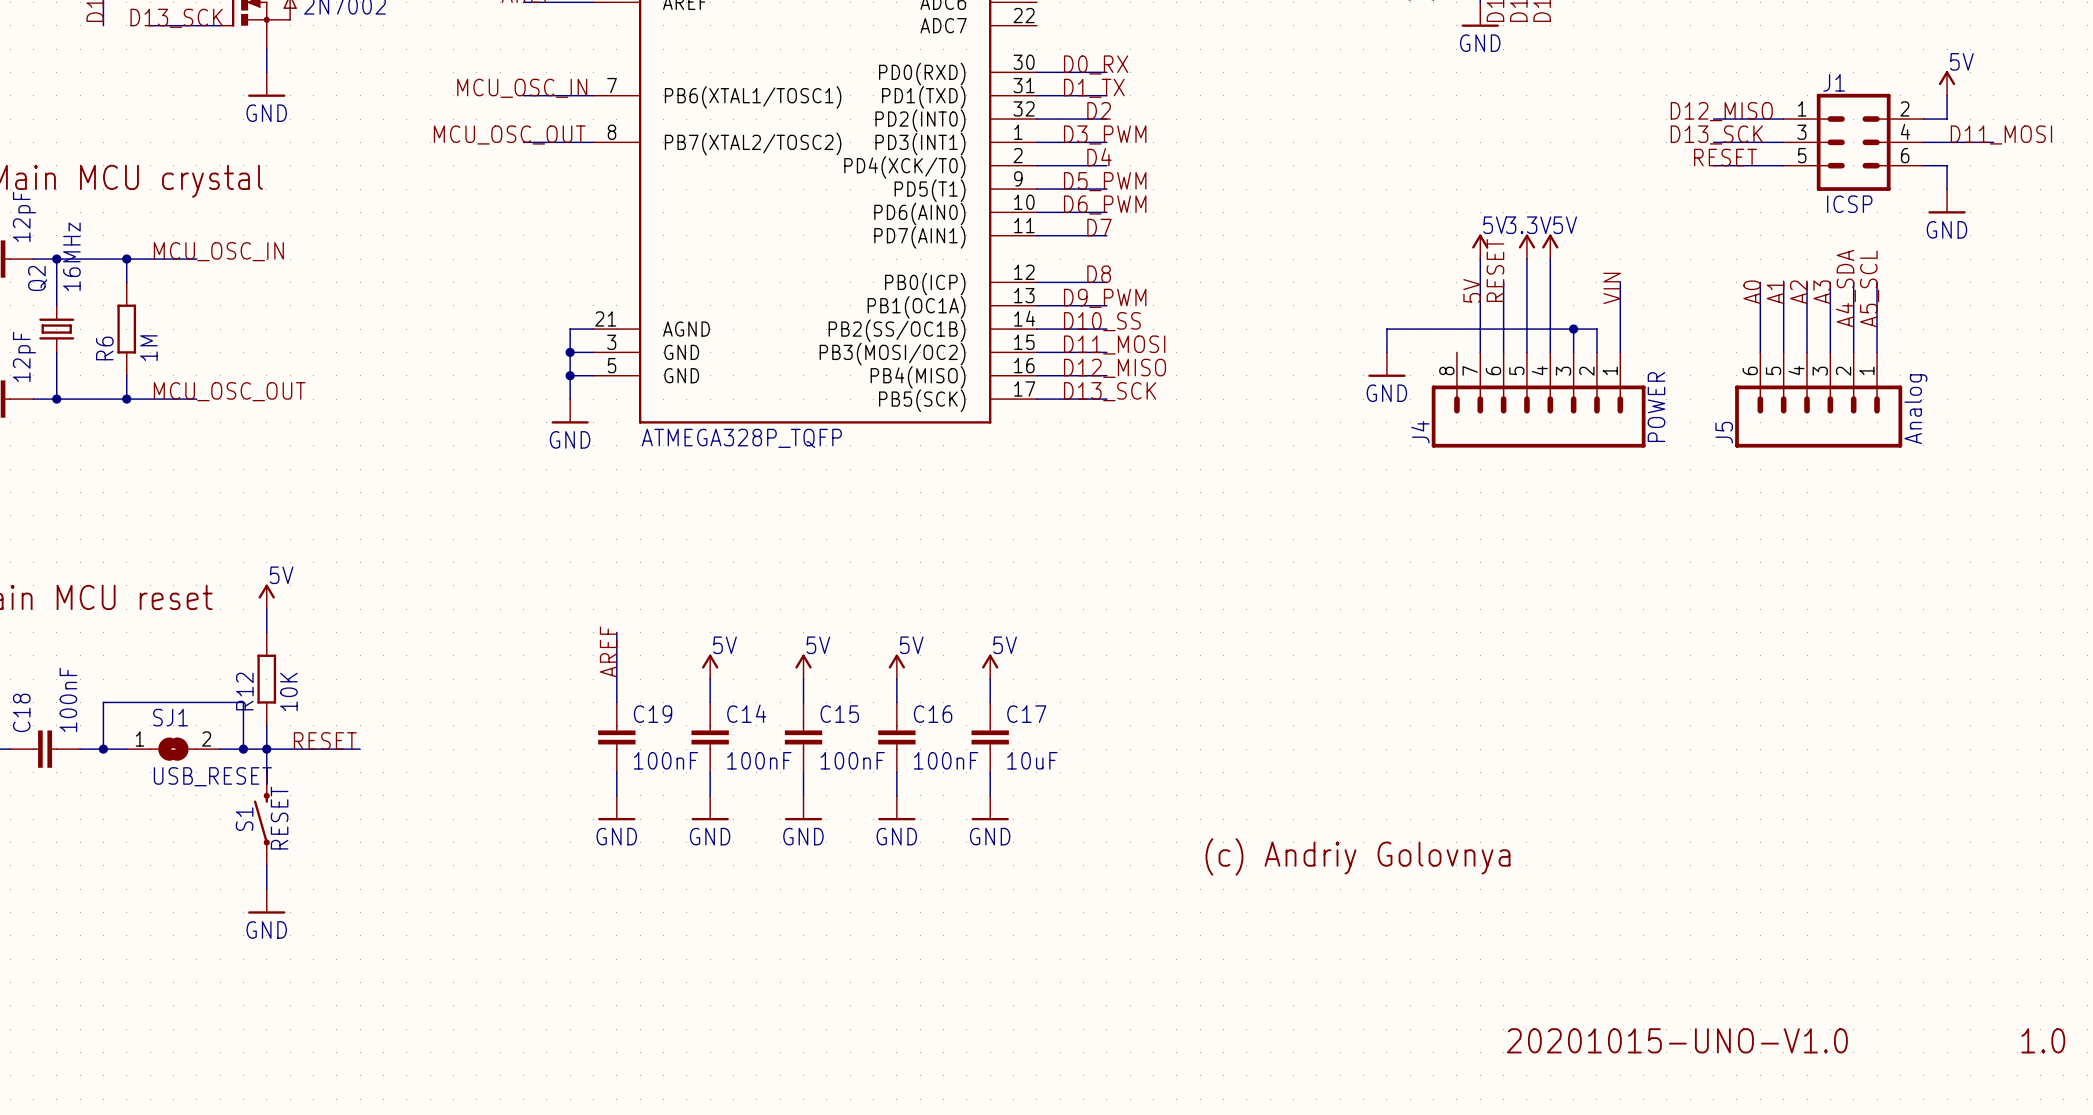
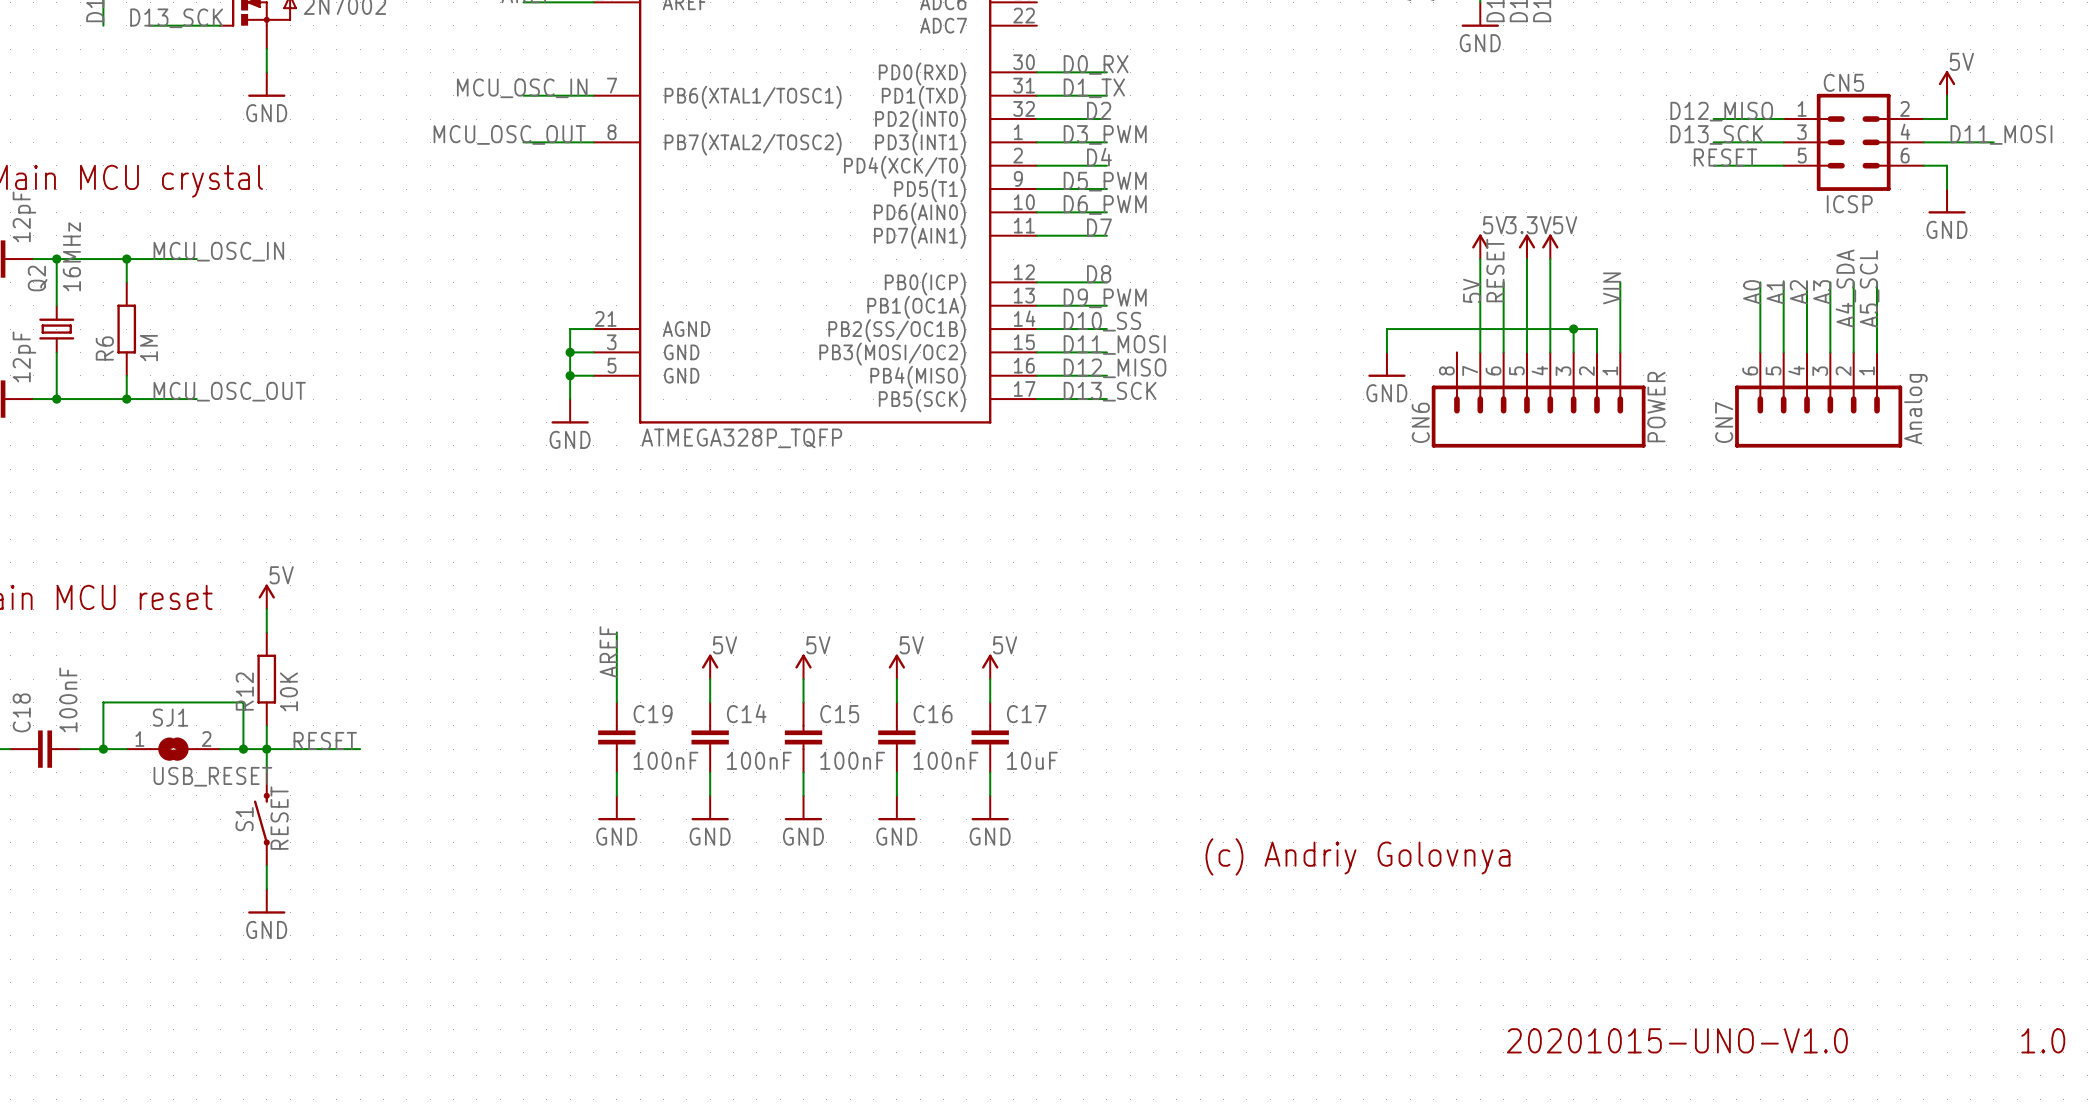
J1 name: J1 (1834, 82) -> CN5 (1843, 82)
J4 name: J4 (1420, 432) -> CN6 (1420, 422)
J5 name: J5 (1724, 432) -> CN7 (1724, 422)

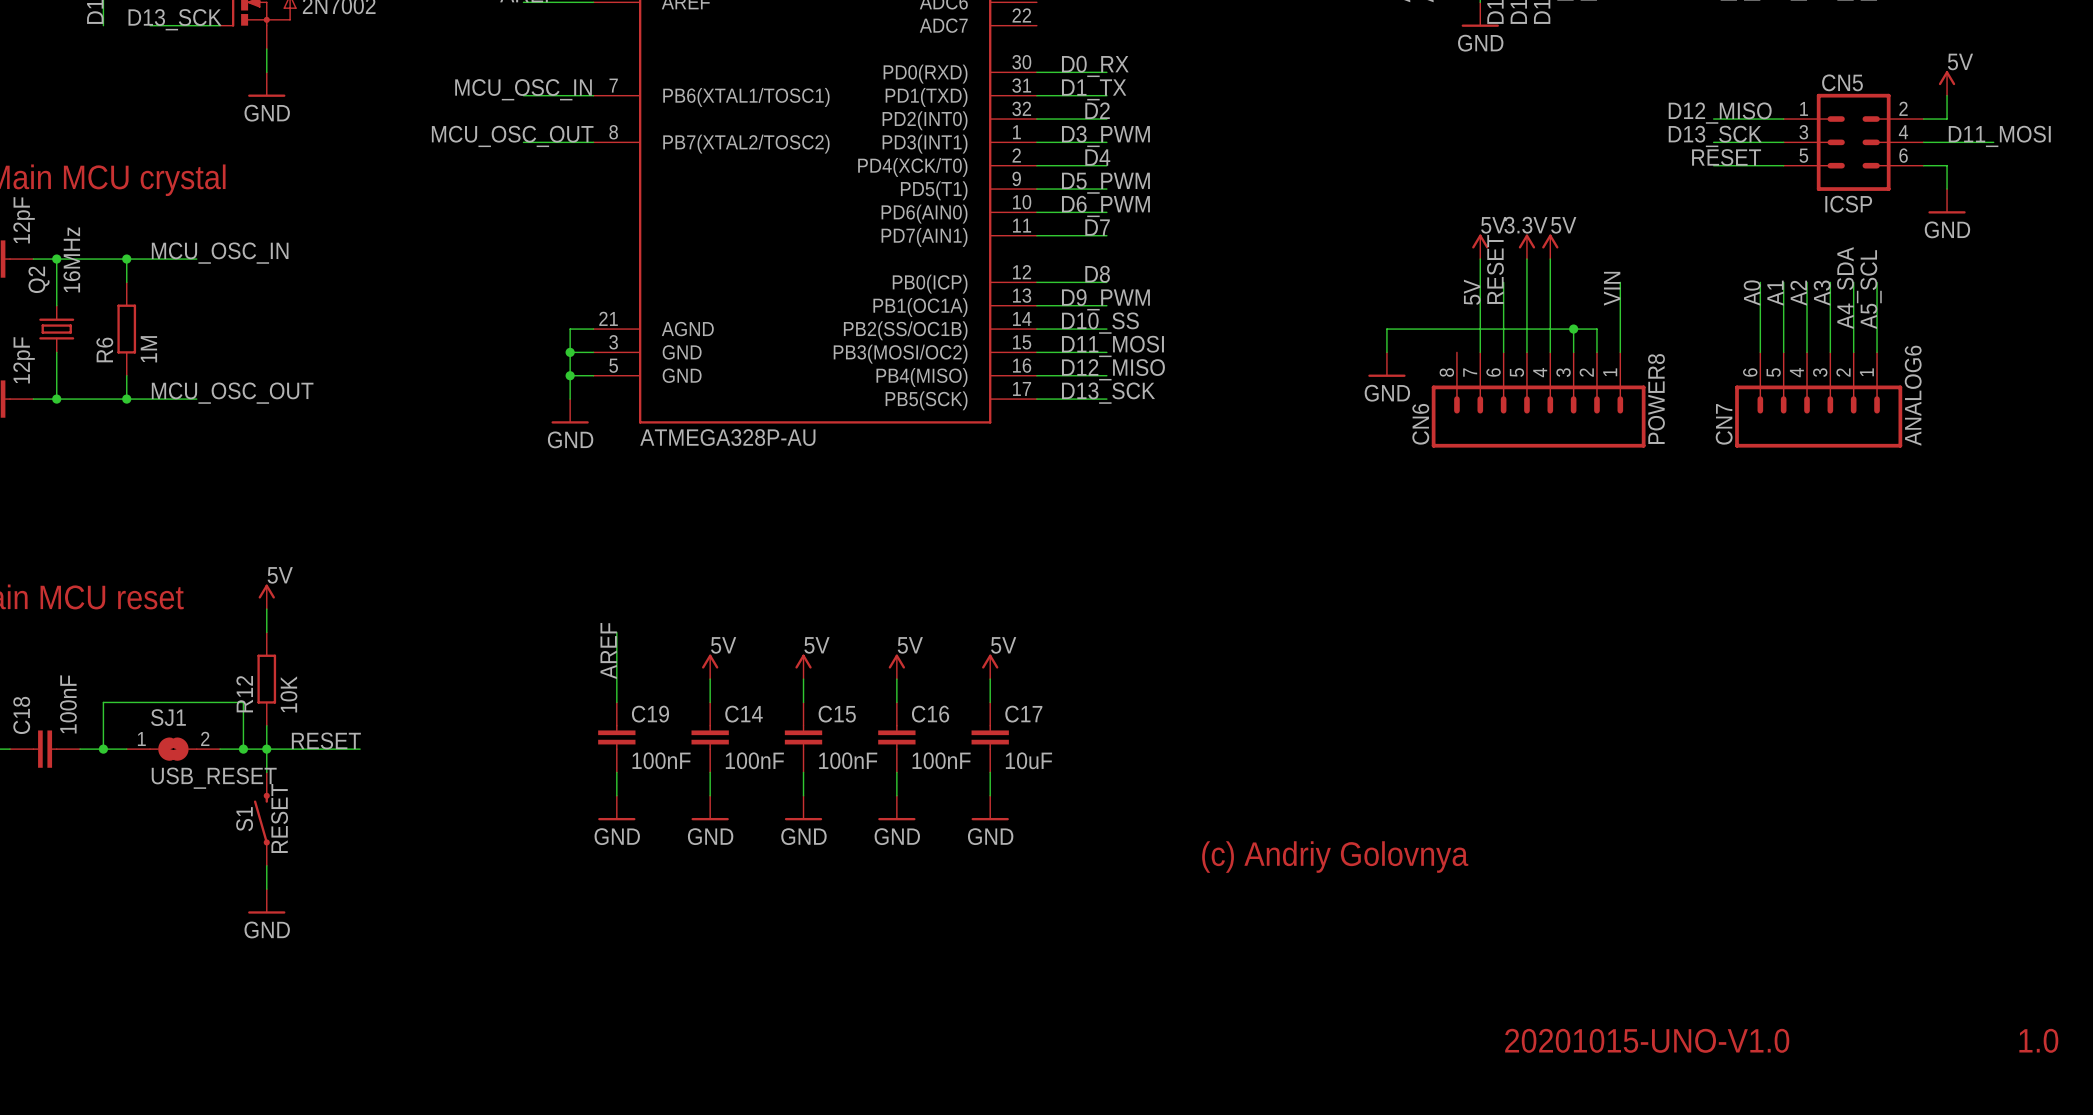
CN6 value: POWER (1656, 407) -> POWER8 (1656, 399)
CN7 value: Analog (1915, 409) -> ANALOG6 (1913, 395)
part value: ATMEGA328P_TQFP (741, 438) -> ATMEGA328P-AU (727, 437)

